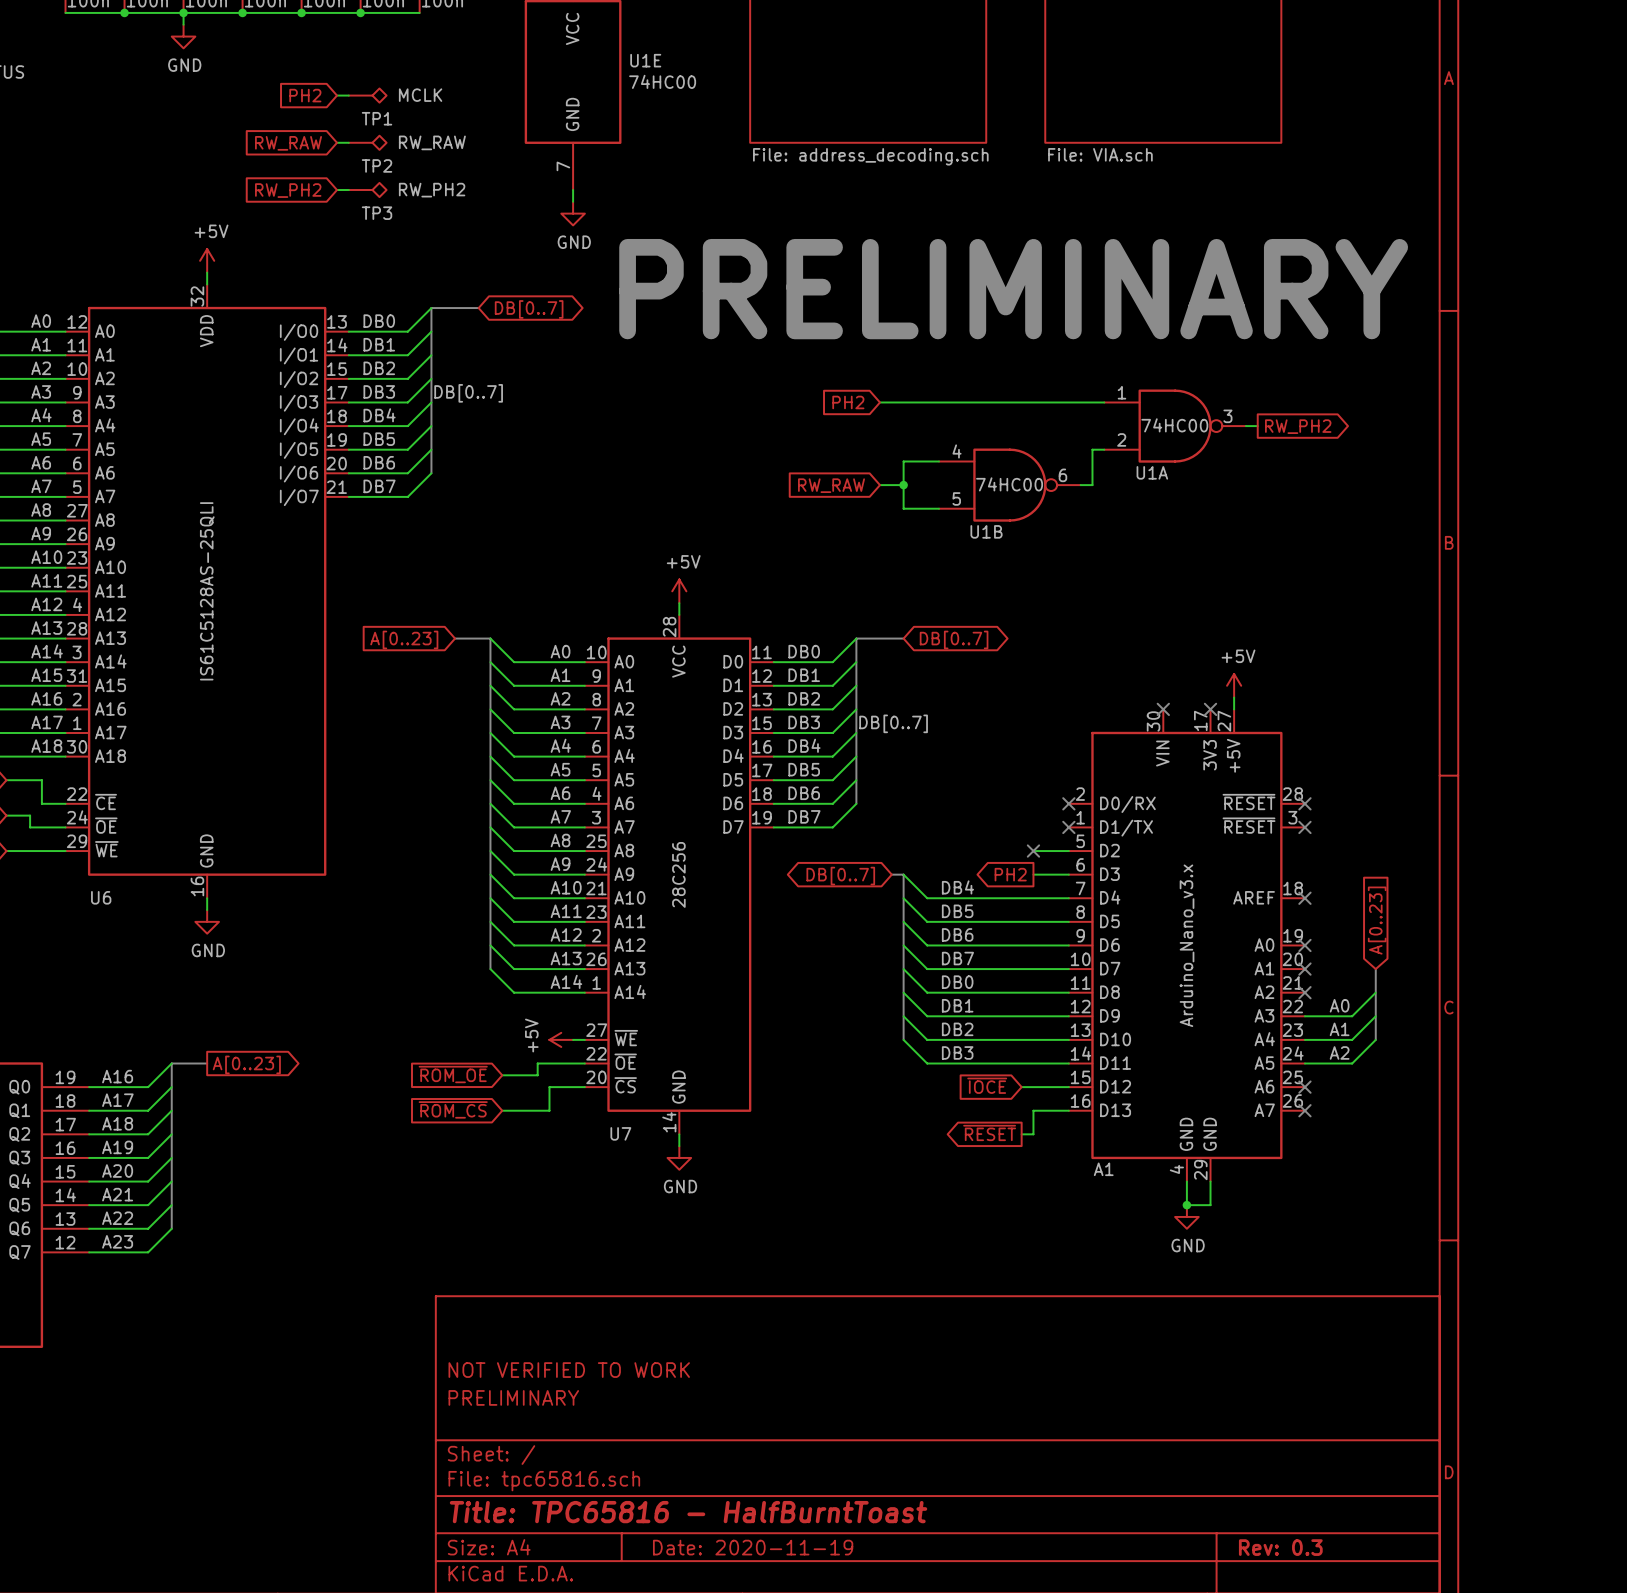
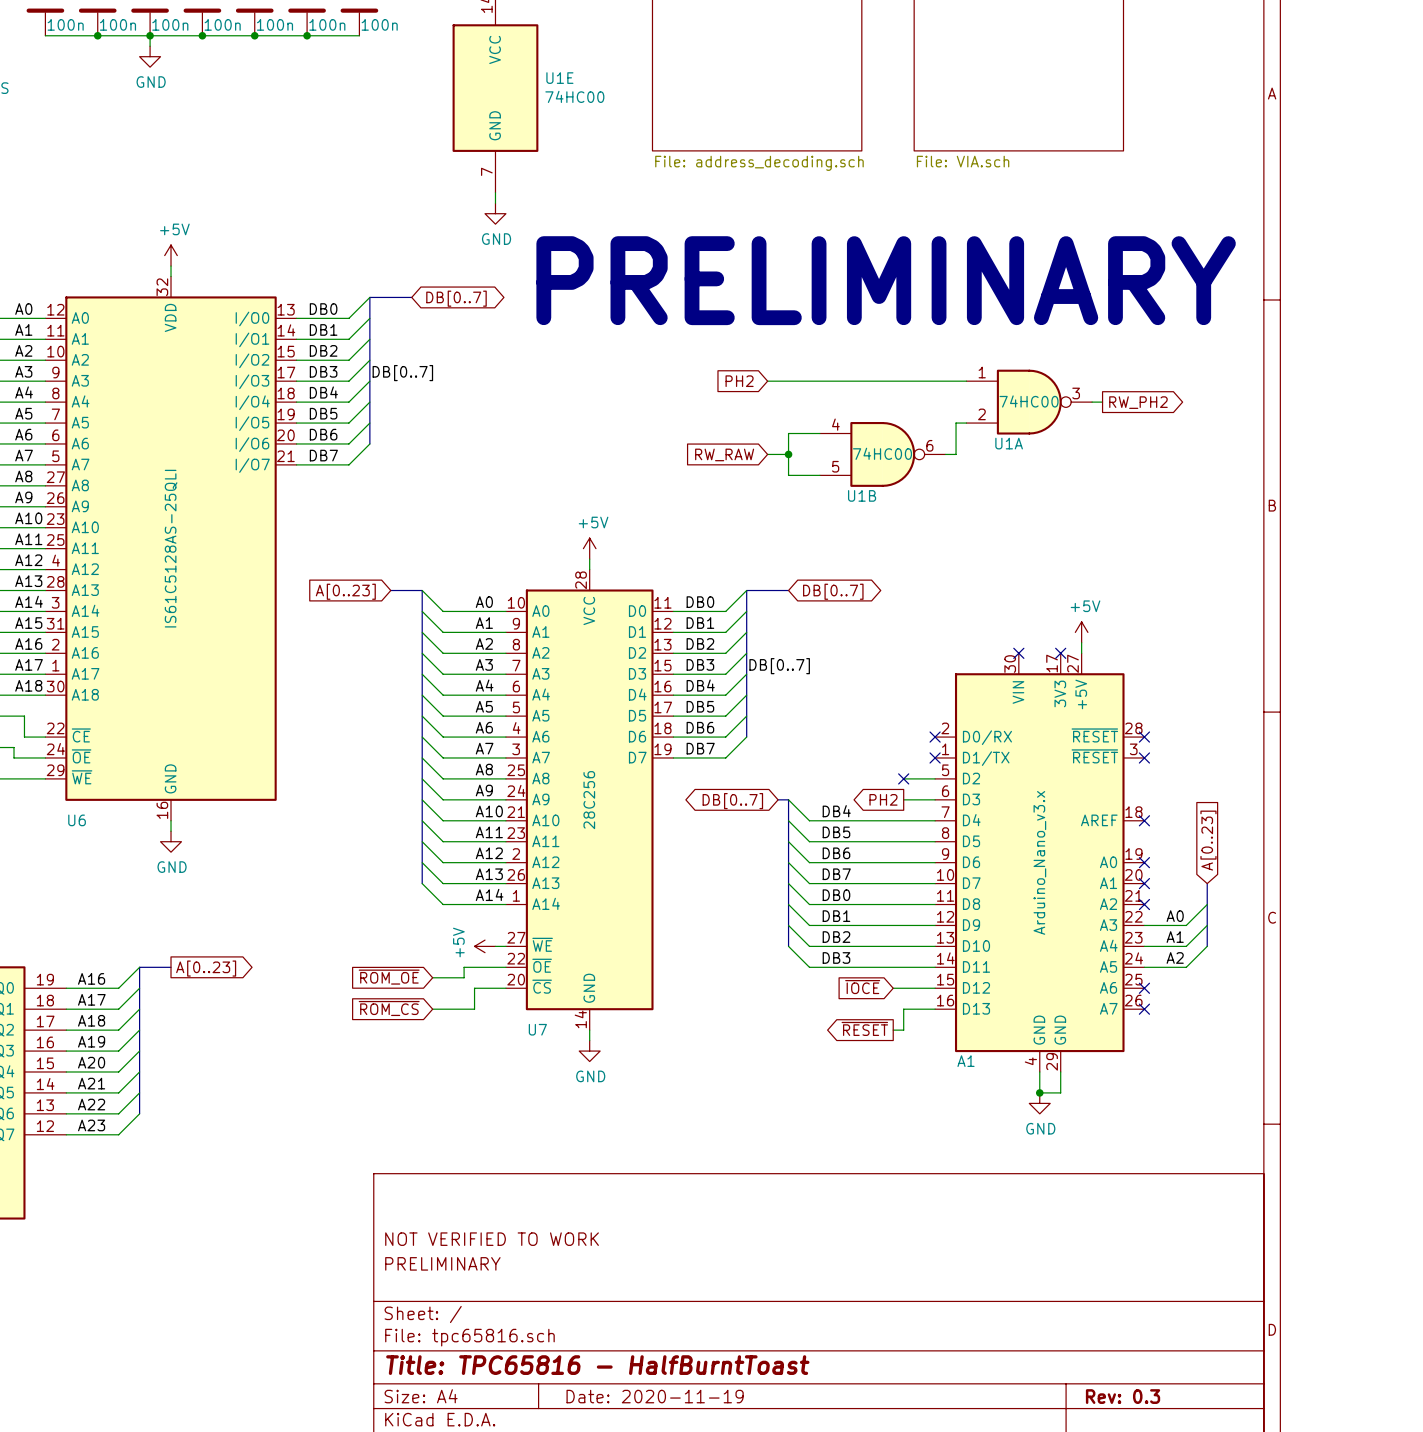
global label: PH2 (305, 95) -> none
wire: (337, 95) (348, 95) -> none
TP1: MCLK (367, 95) -> none
wire: (337, 142) (348, 142) -> none
TP2: RW_RAW (367, 142) -> none
global label: RW_RAW (288, 143) -> none
global label: RW_PH2 (288, 190) -> none
wire: (337, 190) (348, 190) -> none
TP3: RW_PH2 (367, 190) -> none

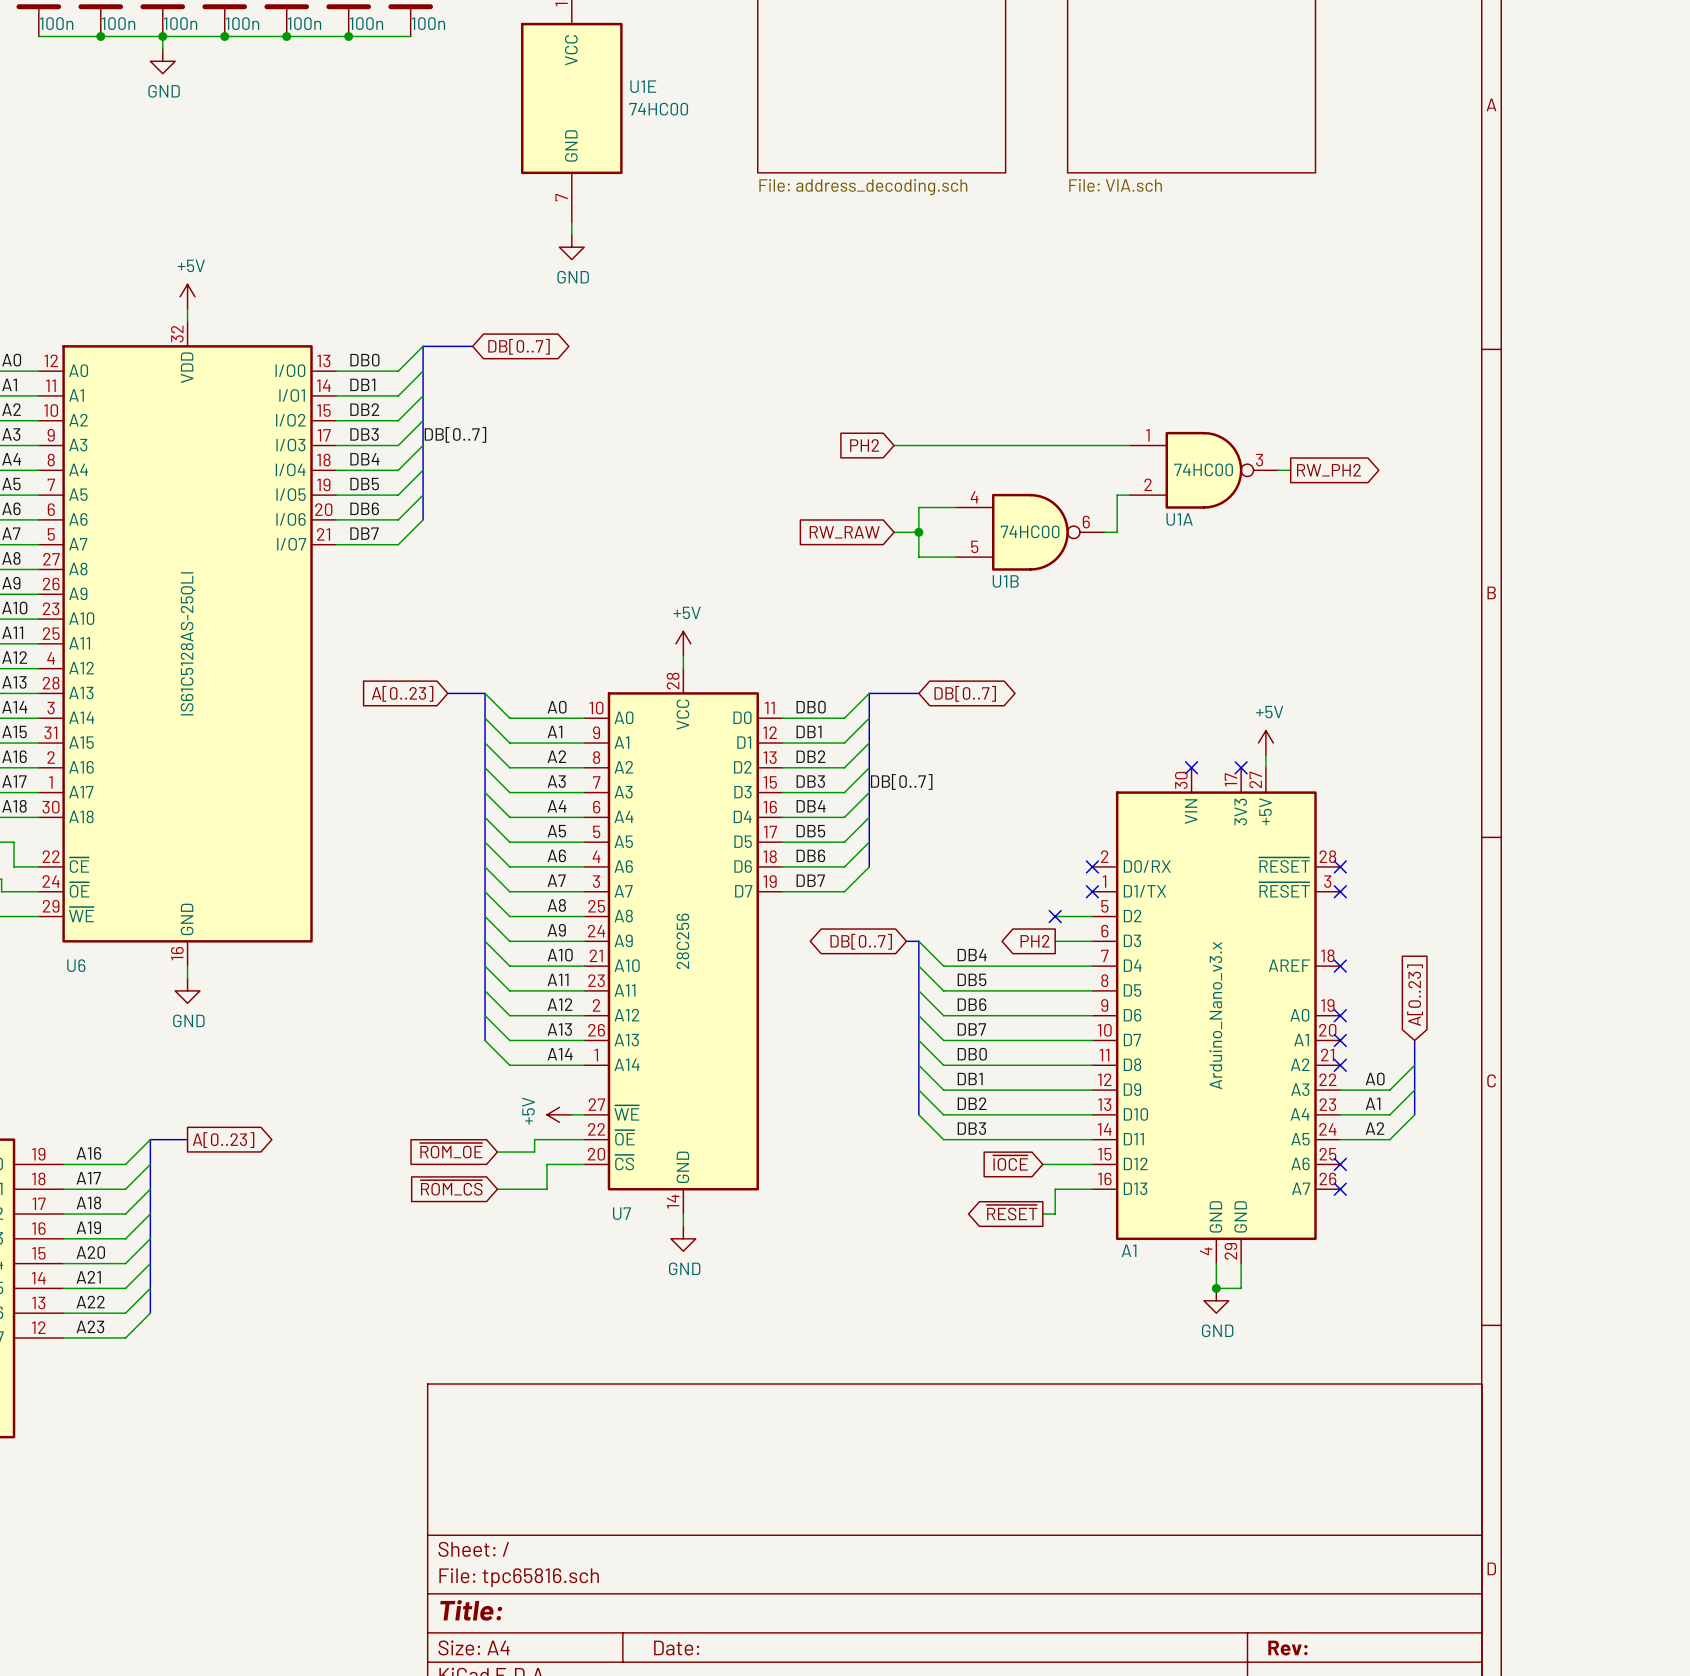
text: PRELIMINARY (886, 280) -> none
title block: NOT VERIFIED TO WORK (492, 1239) -> none
title block: PRELIMINARY (442, 1263) -> none
title block: Title: TPC65816 - HalfBurntToast (597, 1365) -> Title: (471, 1610)
title block: Date: 2020-11-19 (655, 1396) -> Date: (676, 1648)
title block: Rev: 0.3 (1123, 1396) -> Rev: (1287, 1648)

